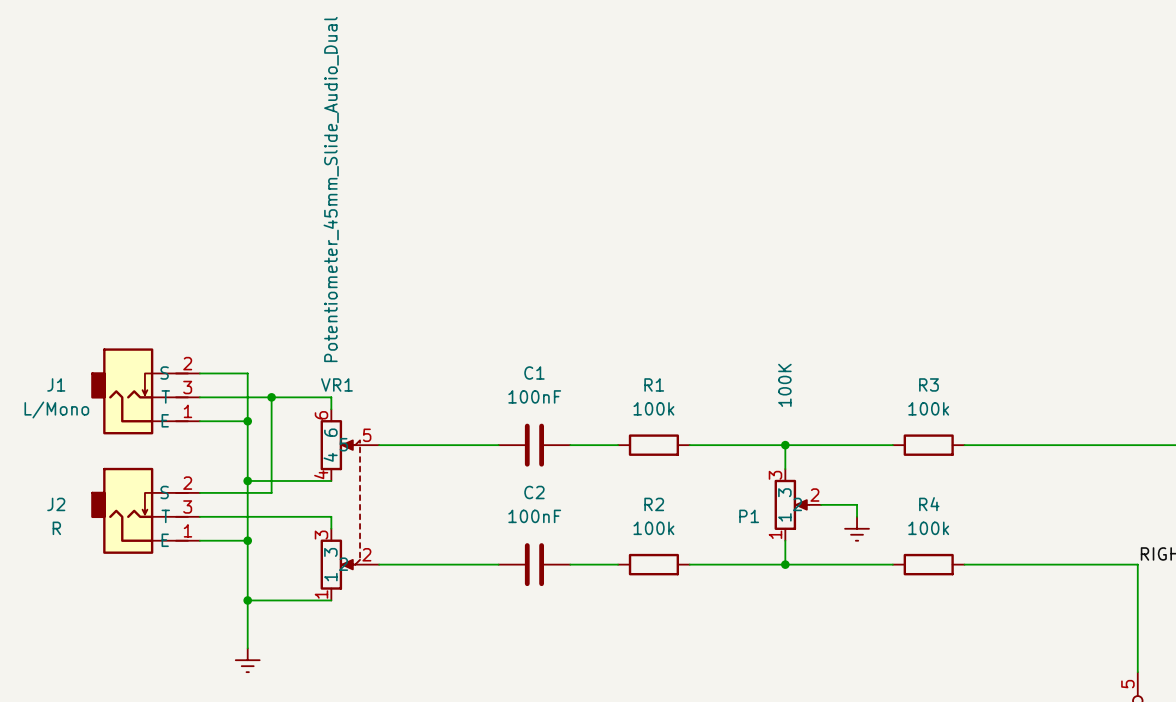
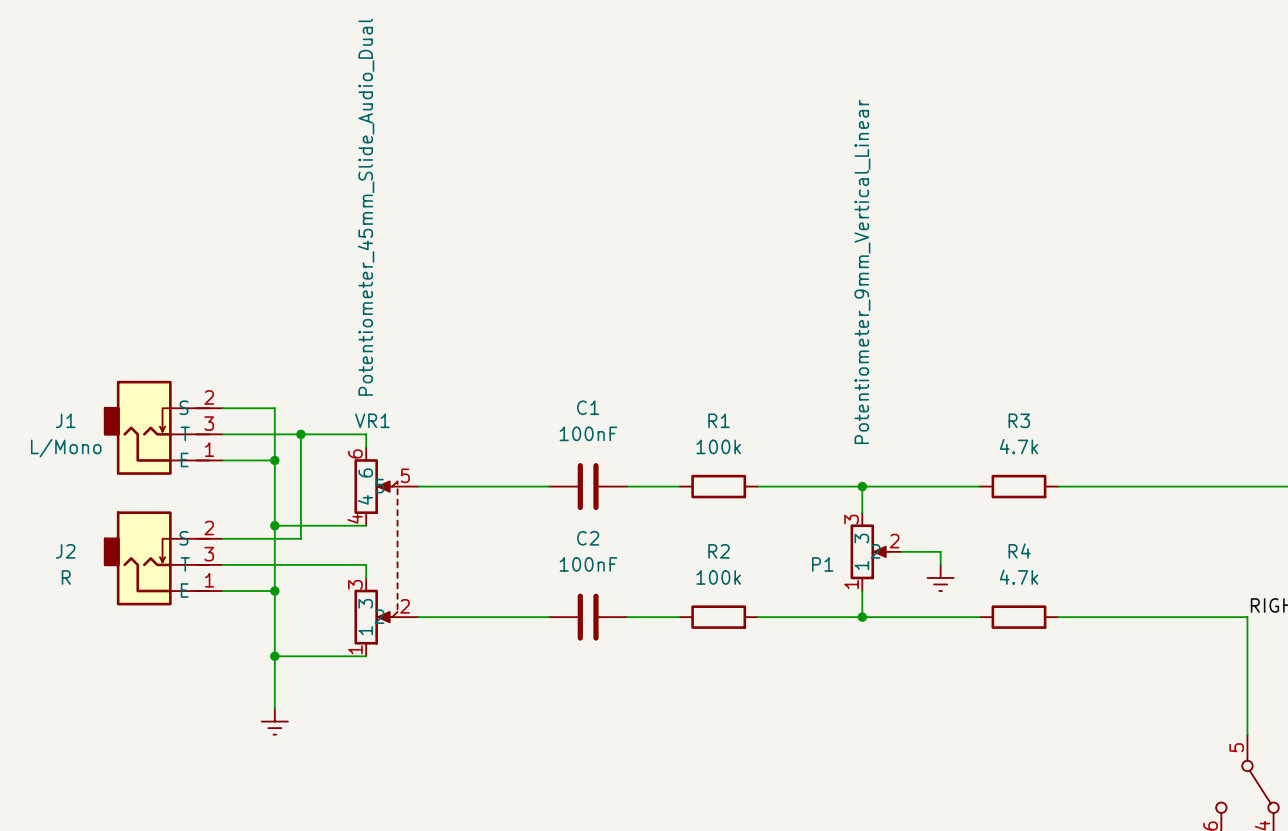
P1 value: 100K (784, 385) -> Potentiometer_9mm_Vertical_Linear (862, 272)
R3 value: 100k (928, 408) -> 4.7k (1018, 446)
R4 value: 100k (928, 528) -> 4.7k (1018, 577)

